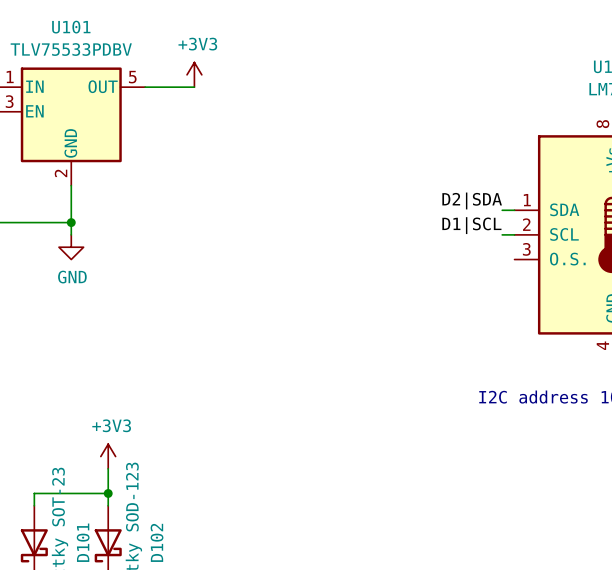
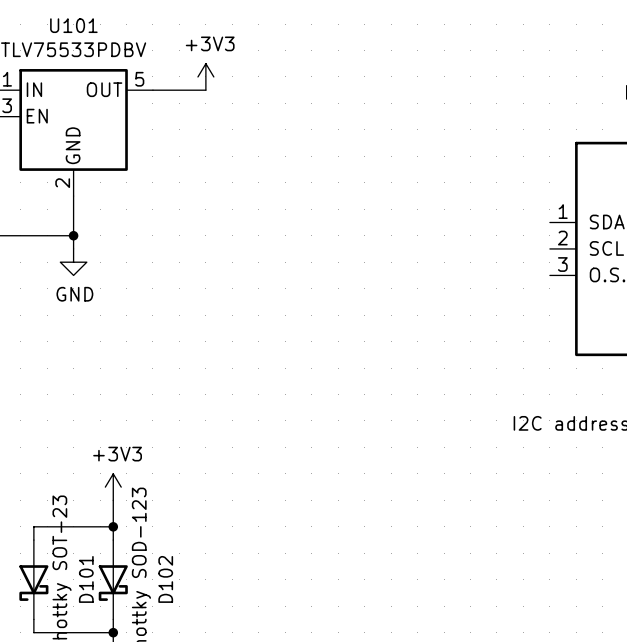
label: D2|SDA (472, 200) -> none
wire: (502, 210) (514, 210) -> none
label: D1|SCL (471, 225) -> none
wire: (502, 234) (514, 234) -> none

